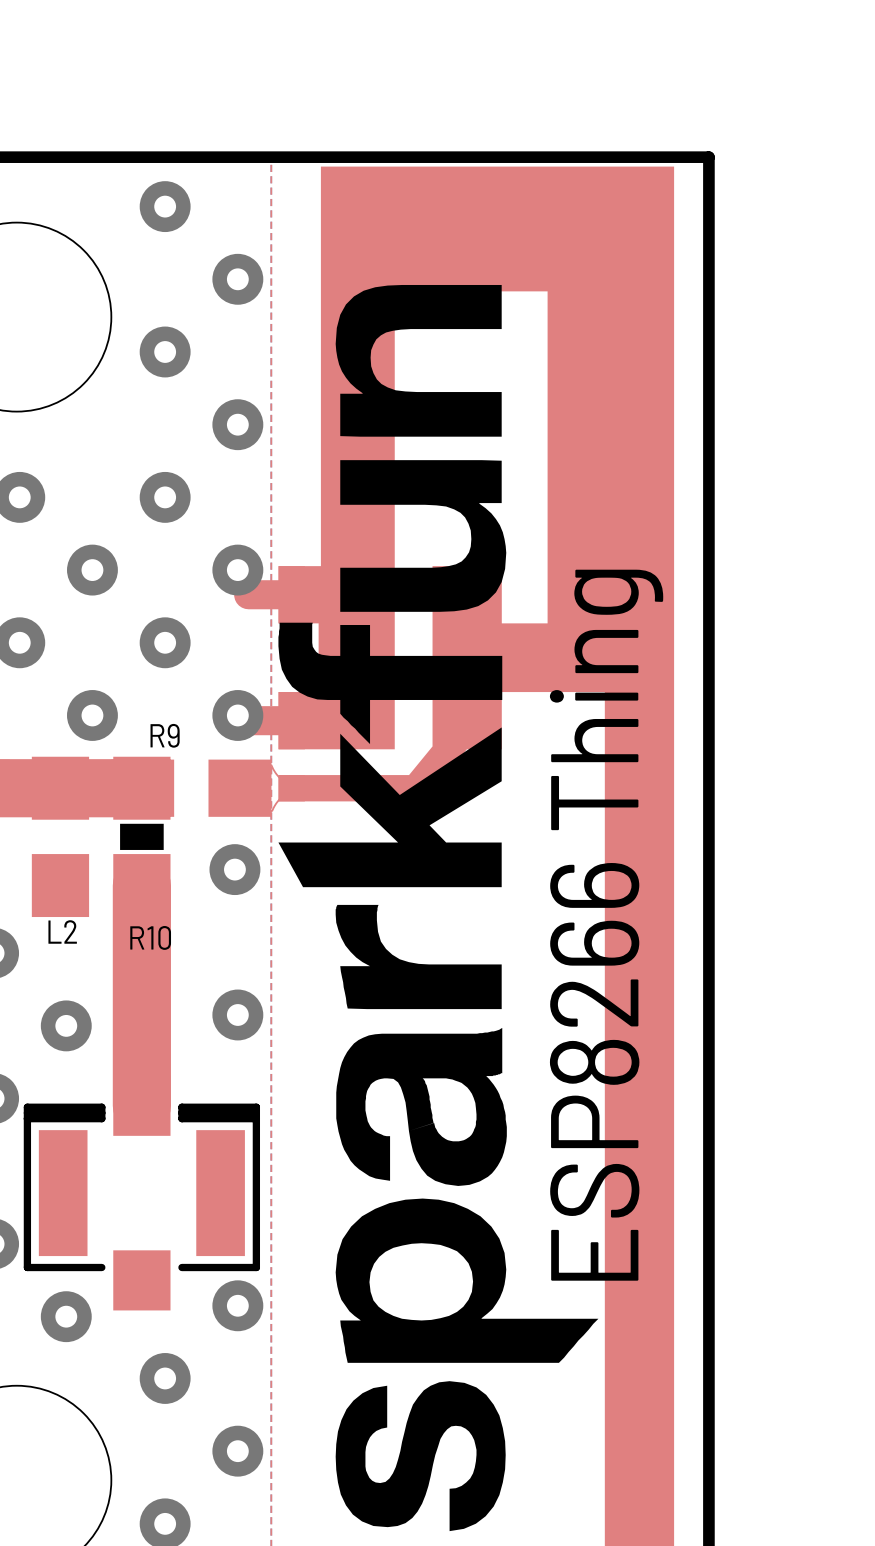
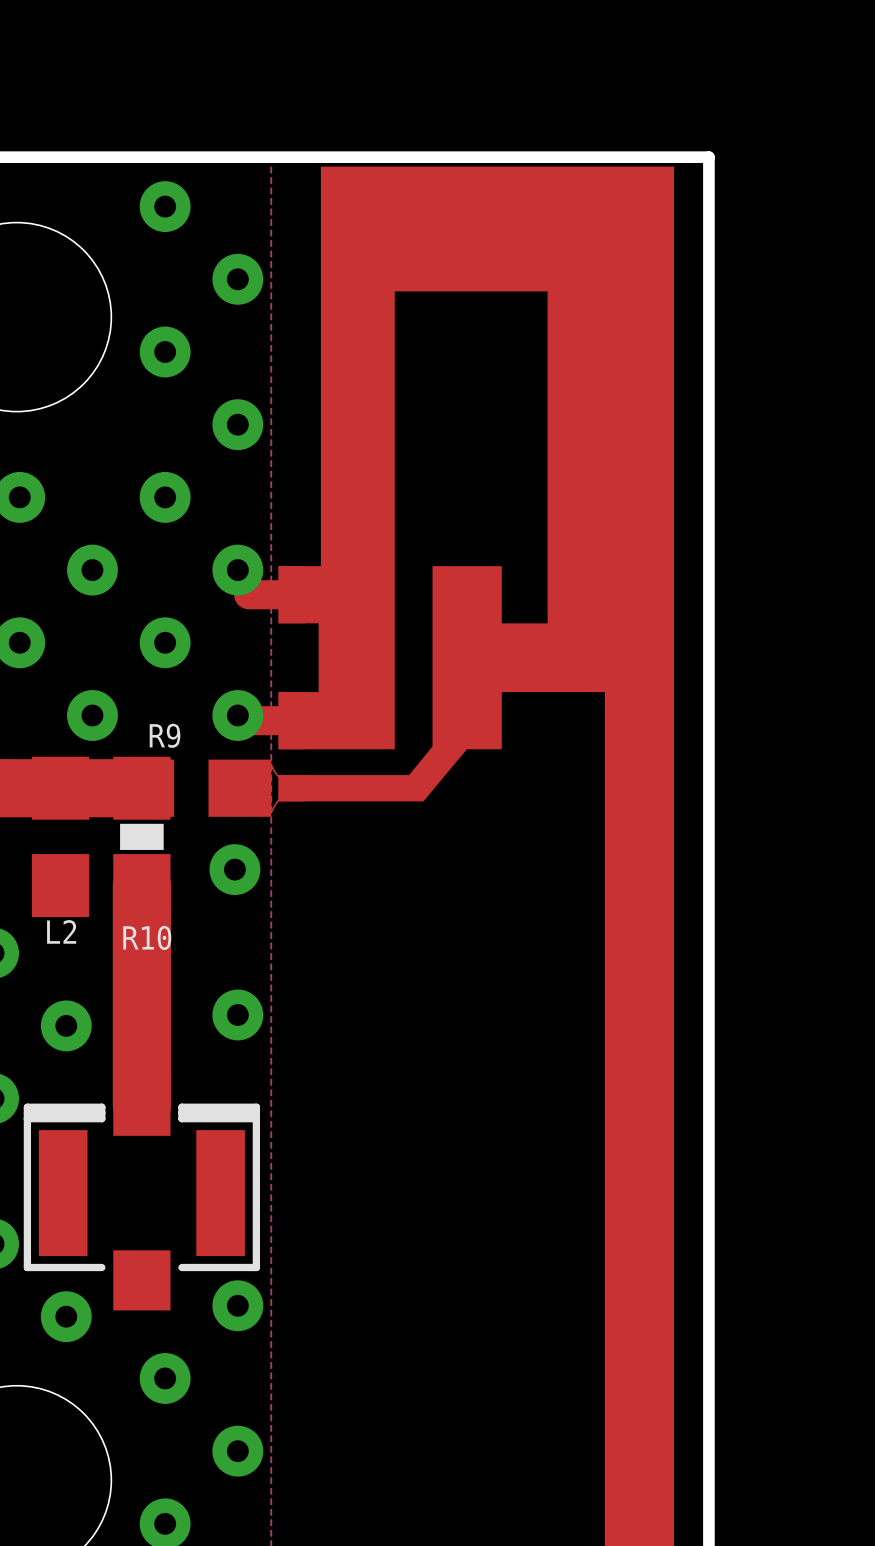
drawing: [278, 284, 599, 1532] -> none
text: ESP8266 Thing (606, 925) -> none

